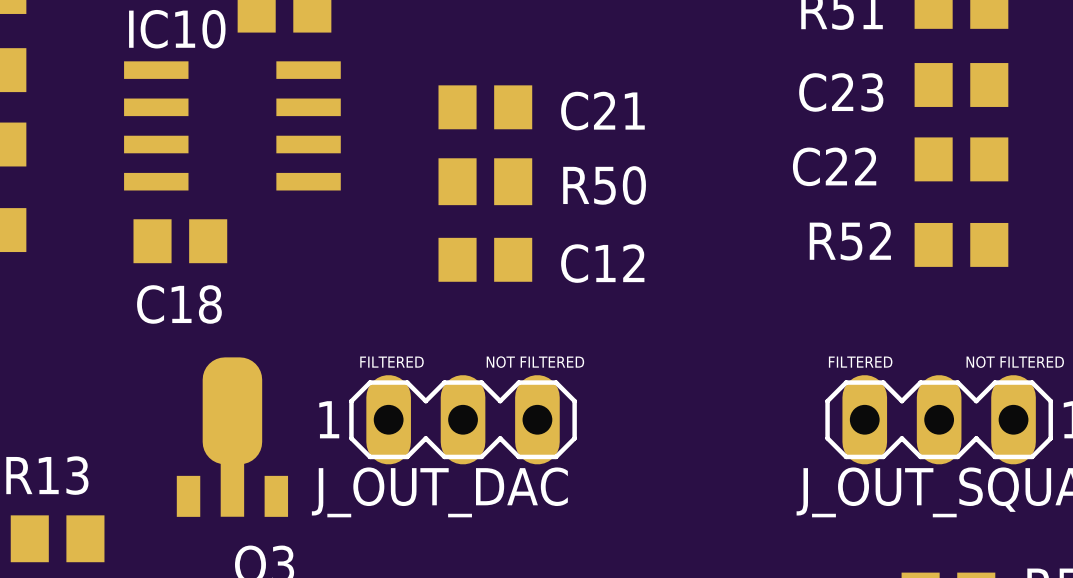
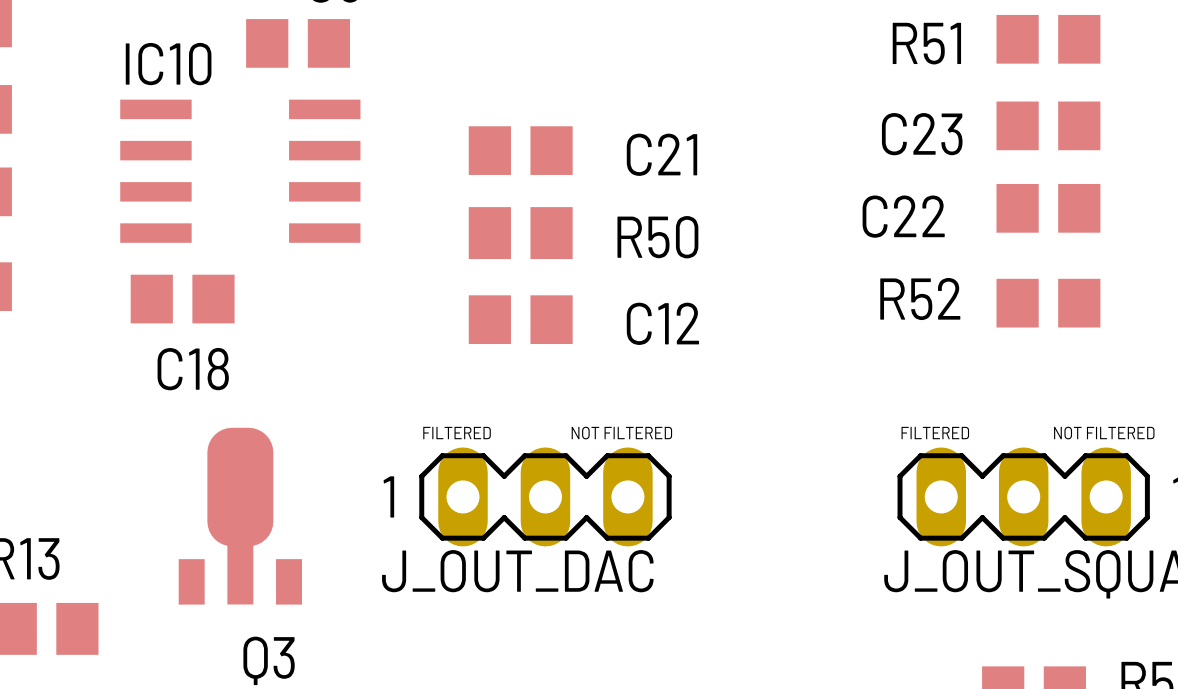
text position: FILTERED (391, 362) -> FILTERED (457, 433)
text position: NOT FILTERED (535, 362) -> NOT FILTERED (621, 433)
J_OUT_DAC position: (463, 419) -> (545, 496)

